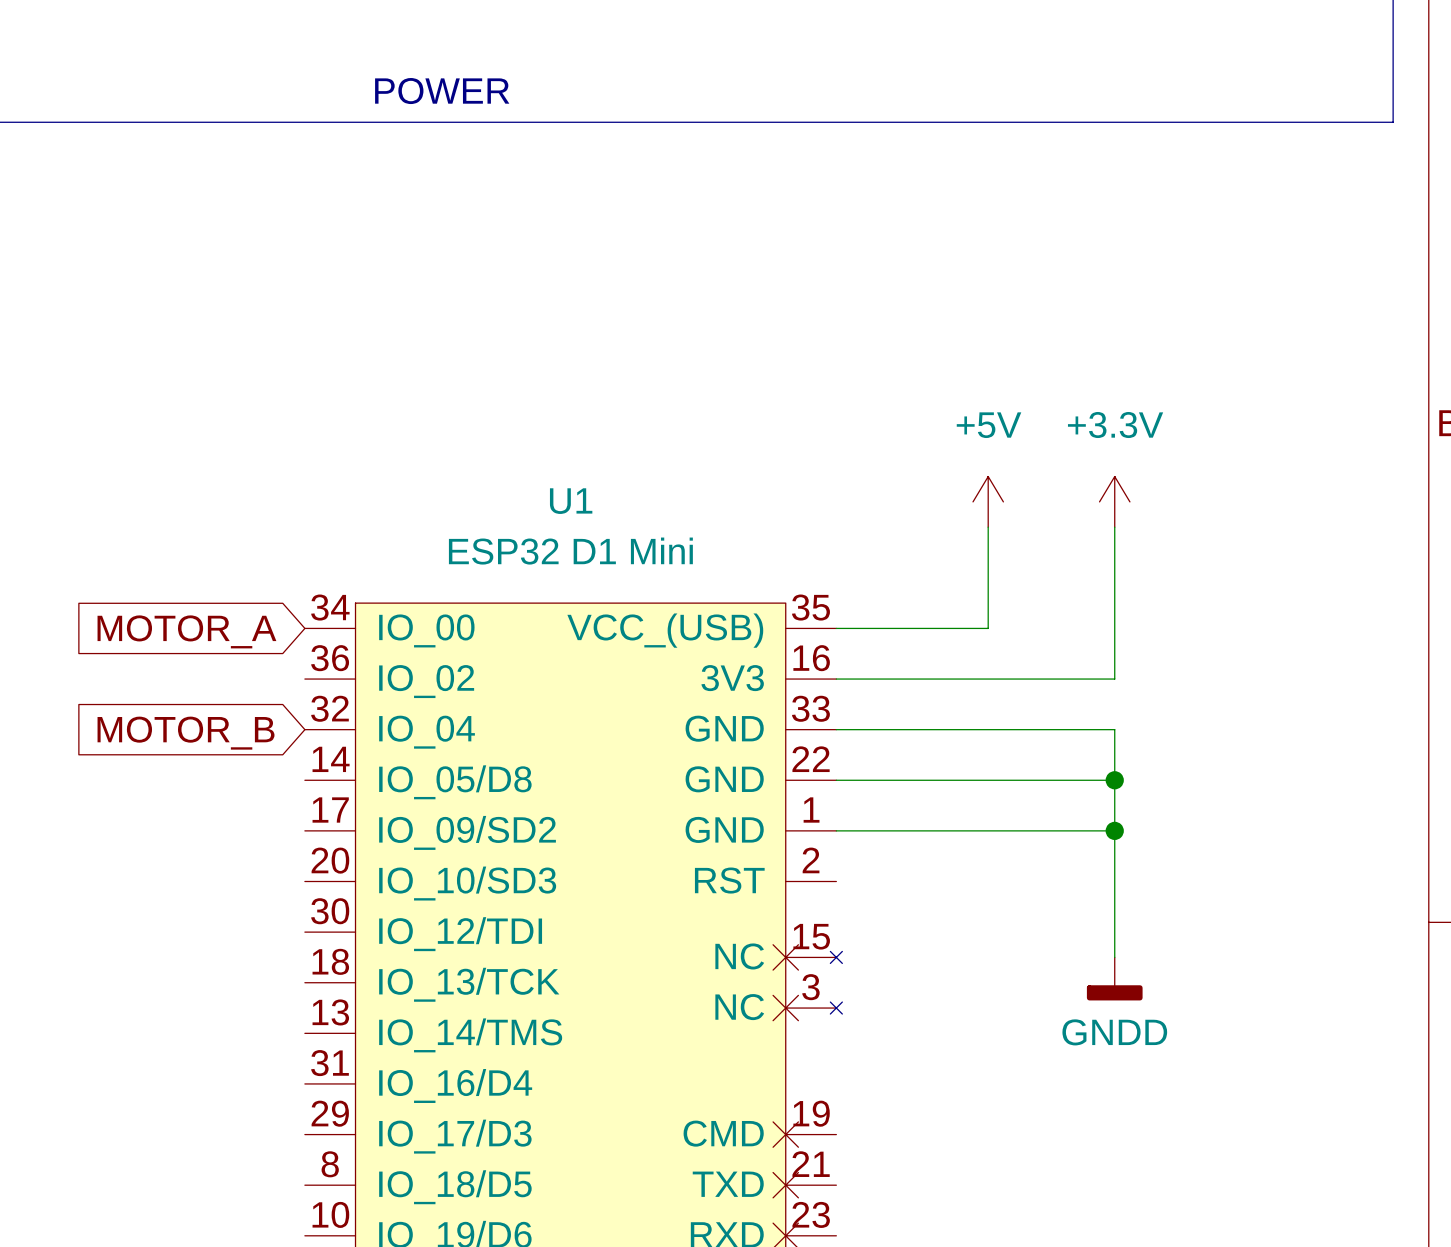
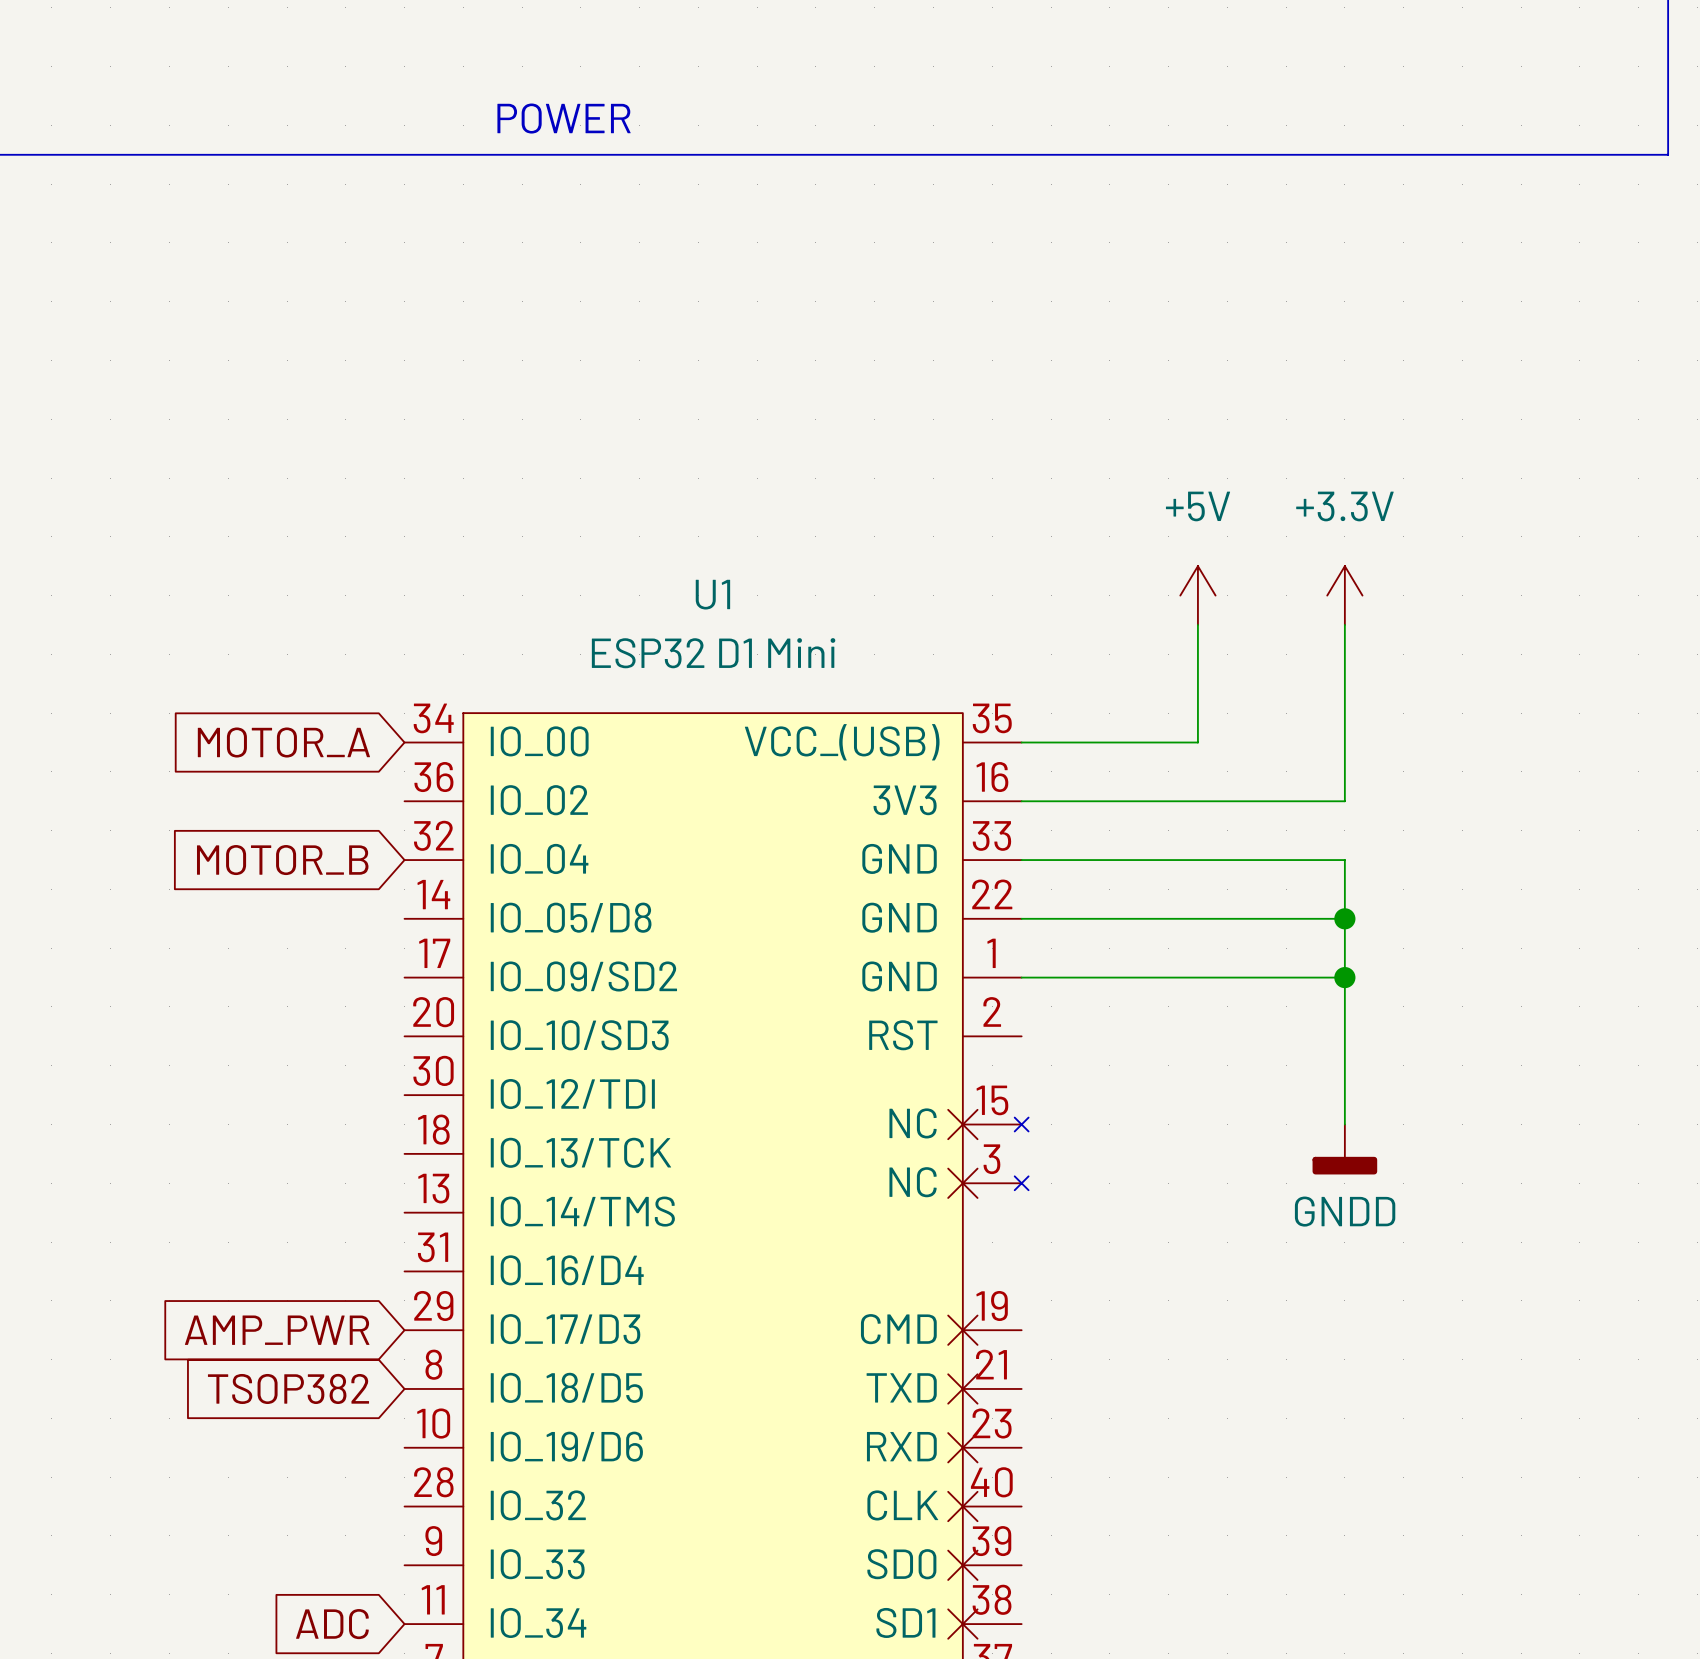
global label: none -> AMP_PWR (277, 1330)
global label: none -> TSOP382 (288, 1388)

